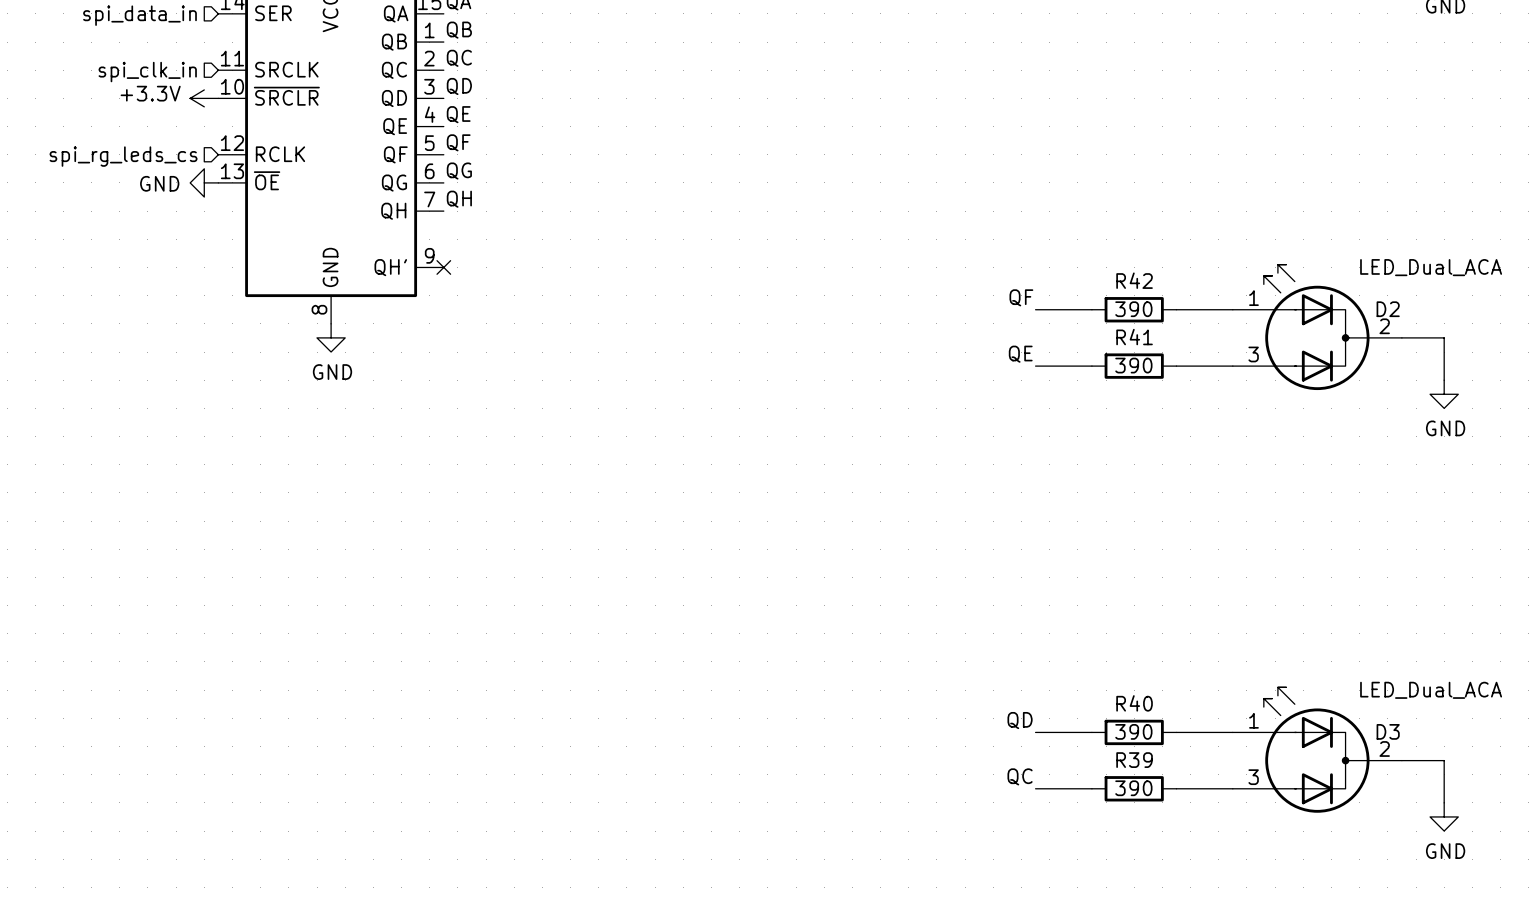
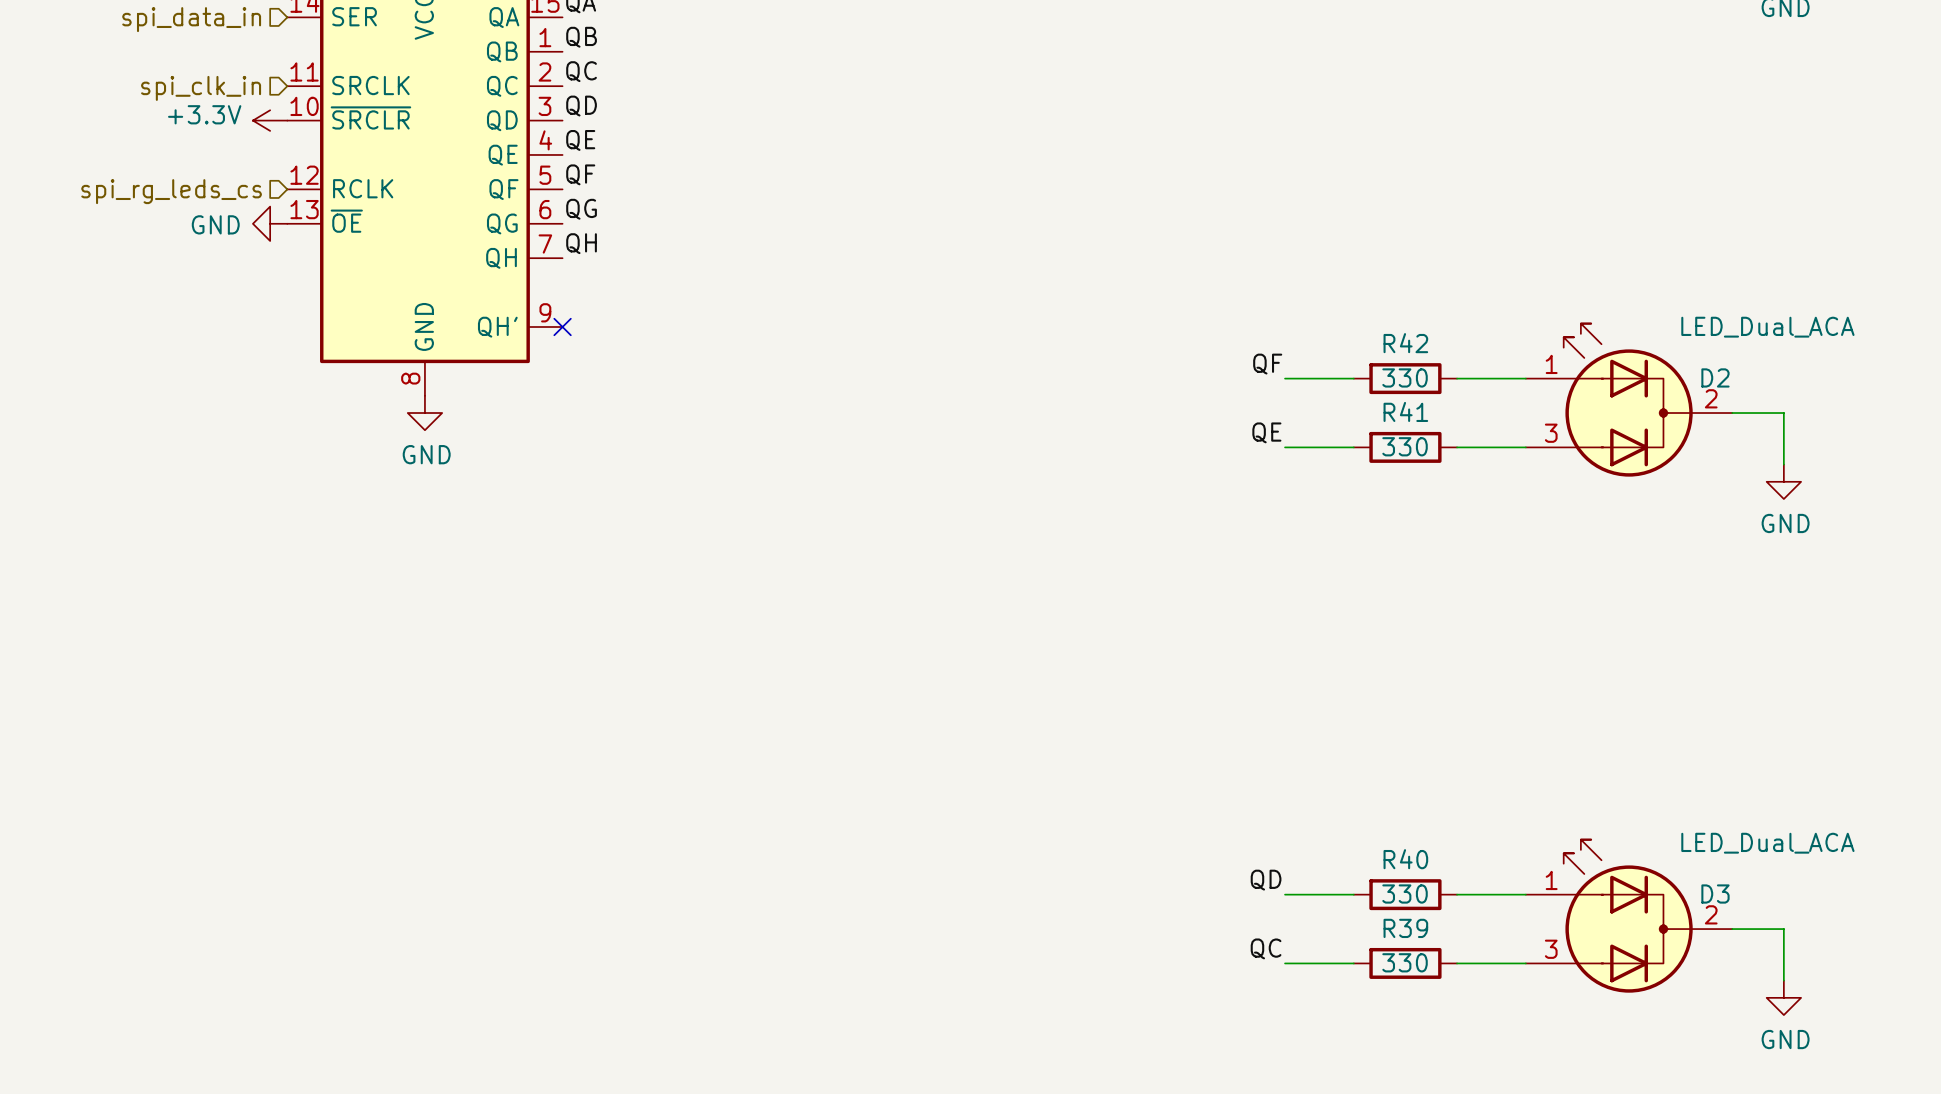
R42 value: 390 (1133, 309) -> 330 (1405, 377)
R41 value: 390 (1133, 365) -> 330 (1405, 446)
R40 value: 390 (1133, 731) -> 330 (1405, 894)
R39 value: 390 (1133, 788) -> 330 (1405, 962)

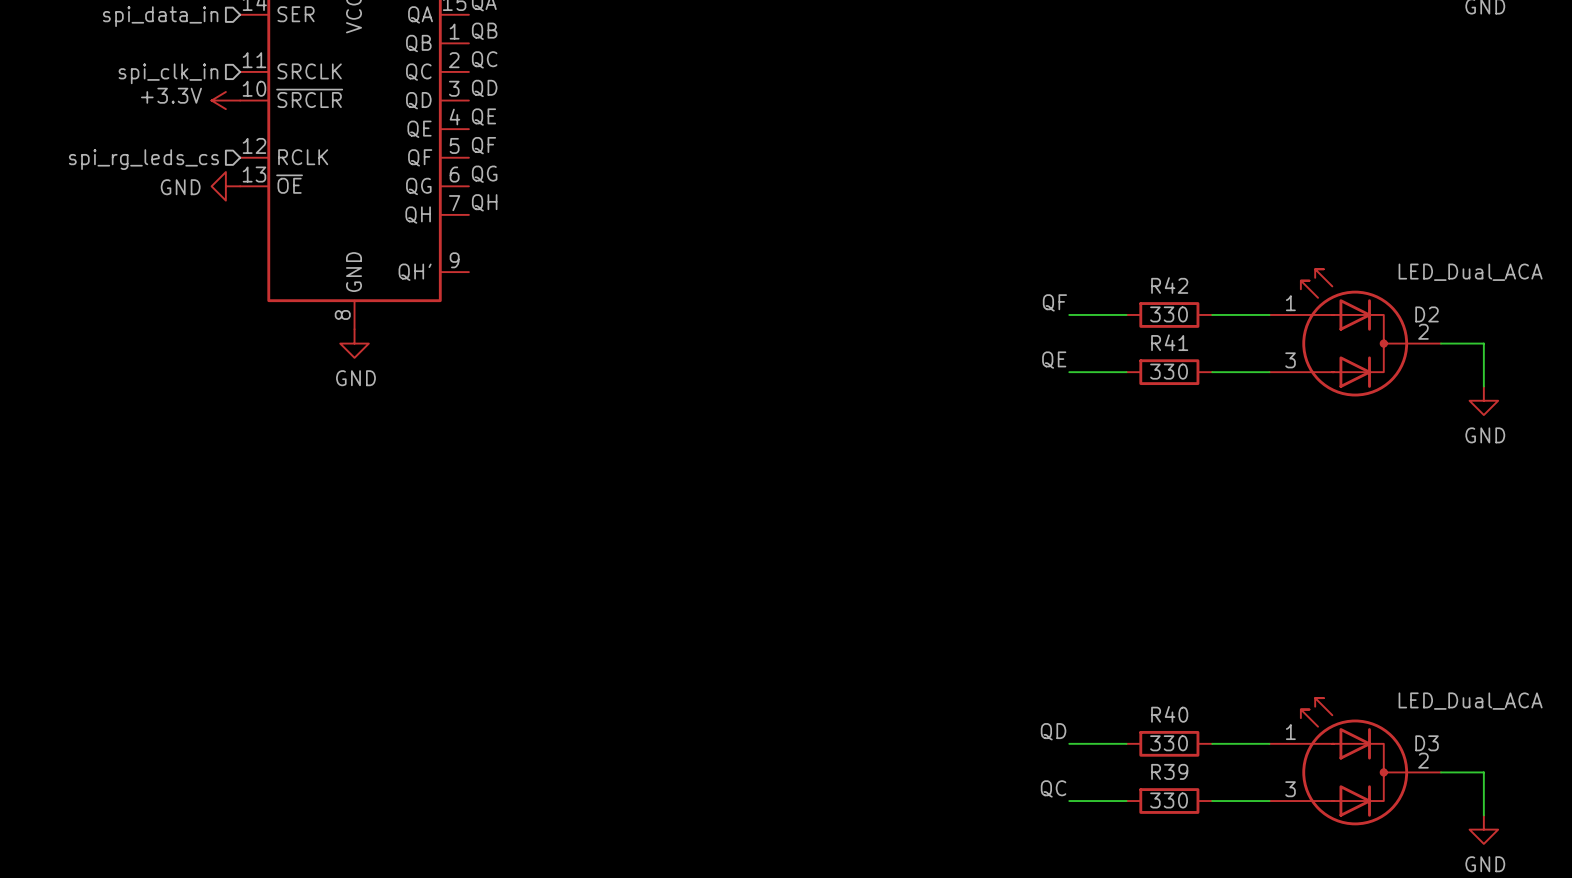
no-connect mark: (562, 326) -> none

